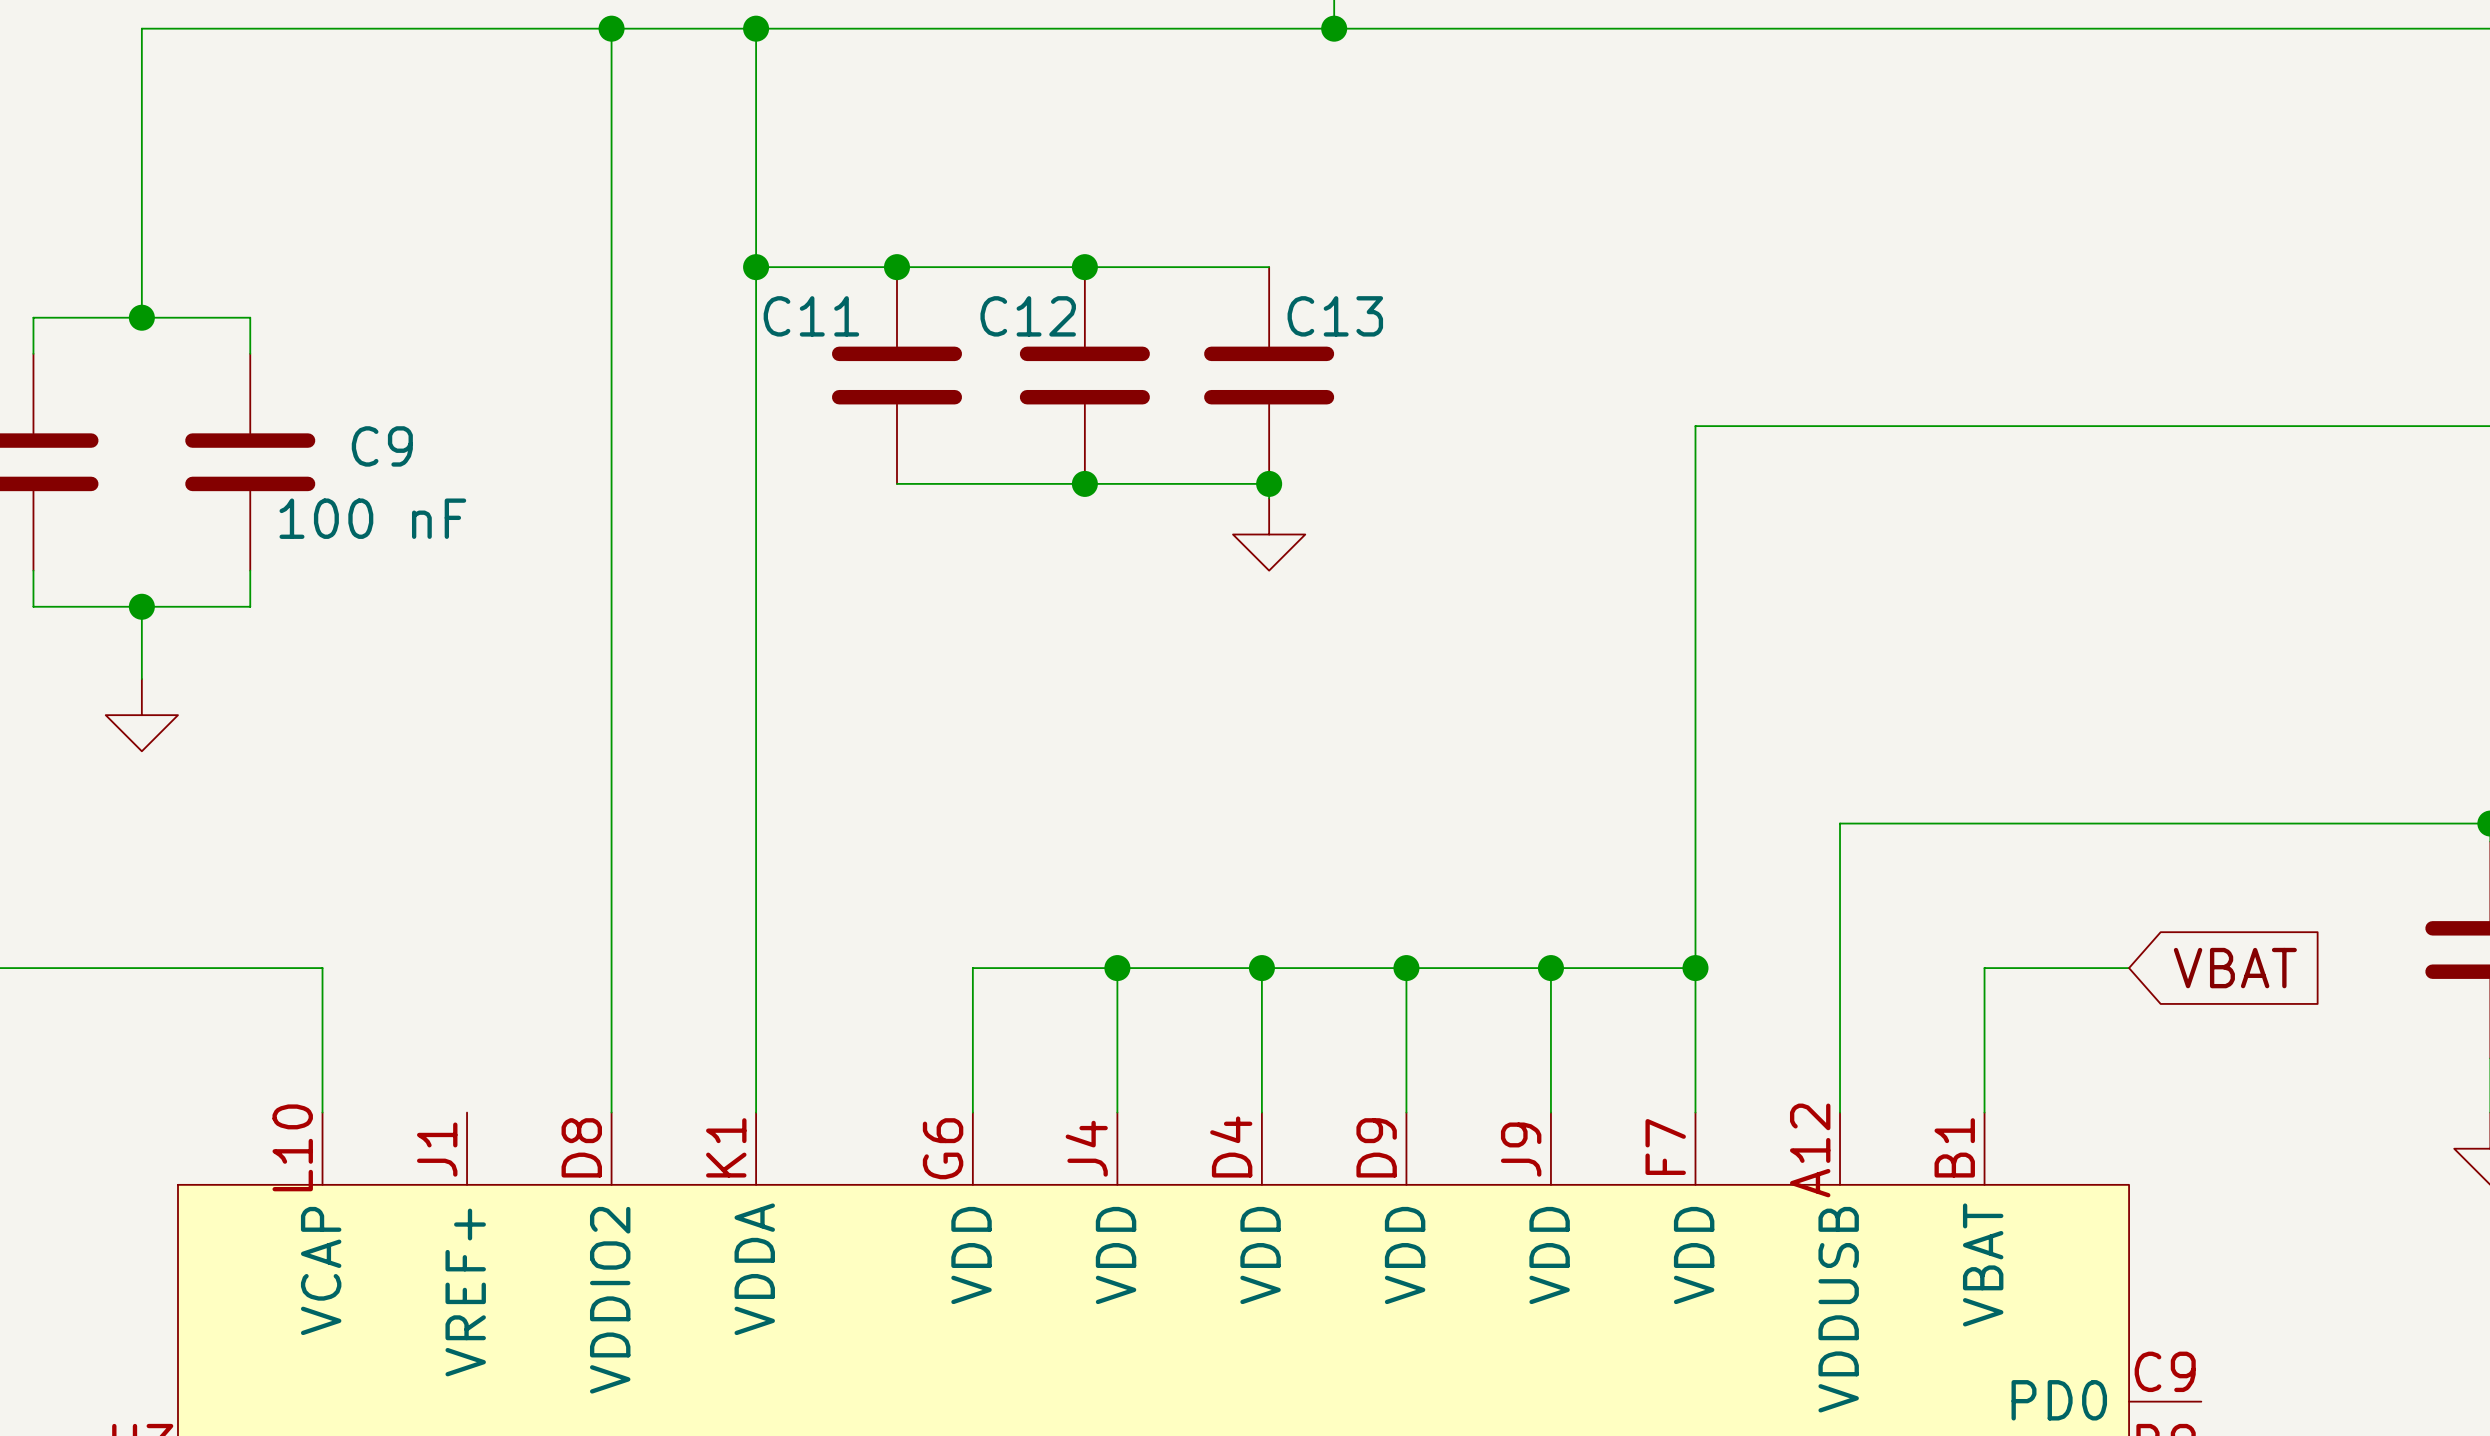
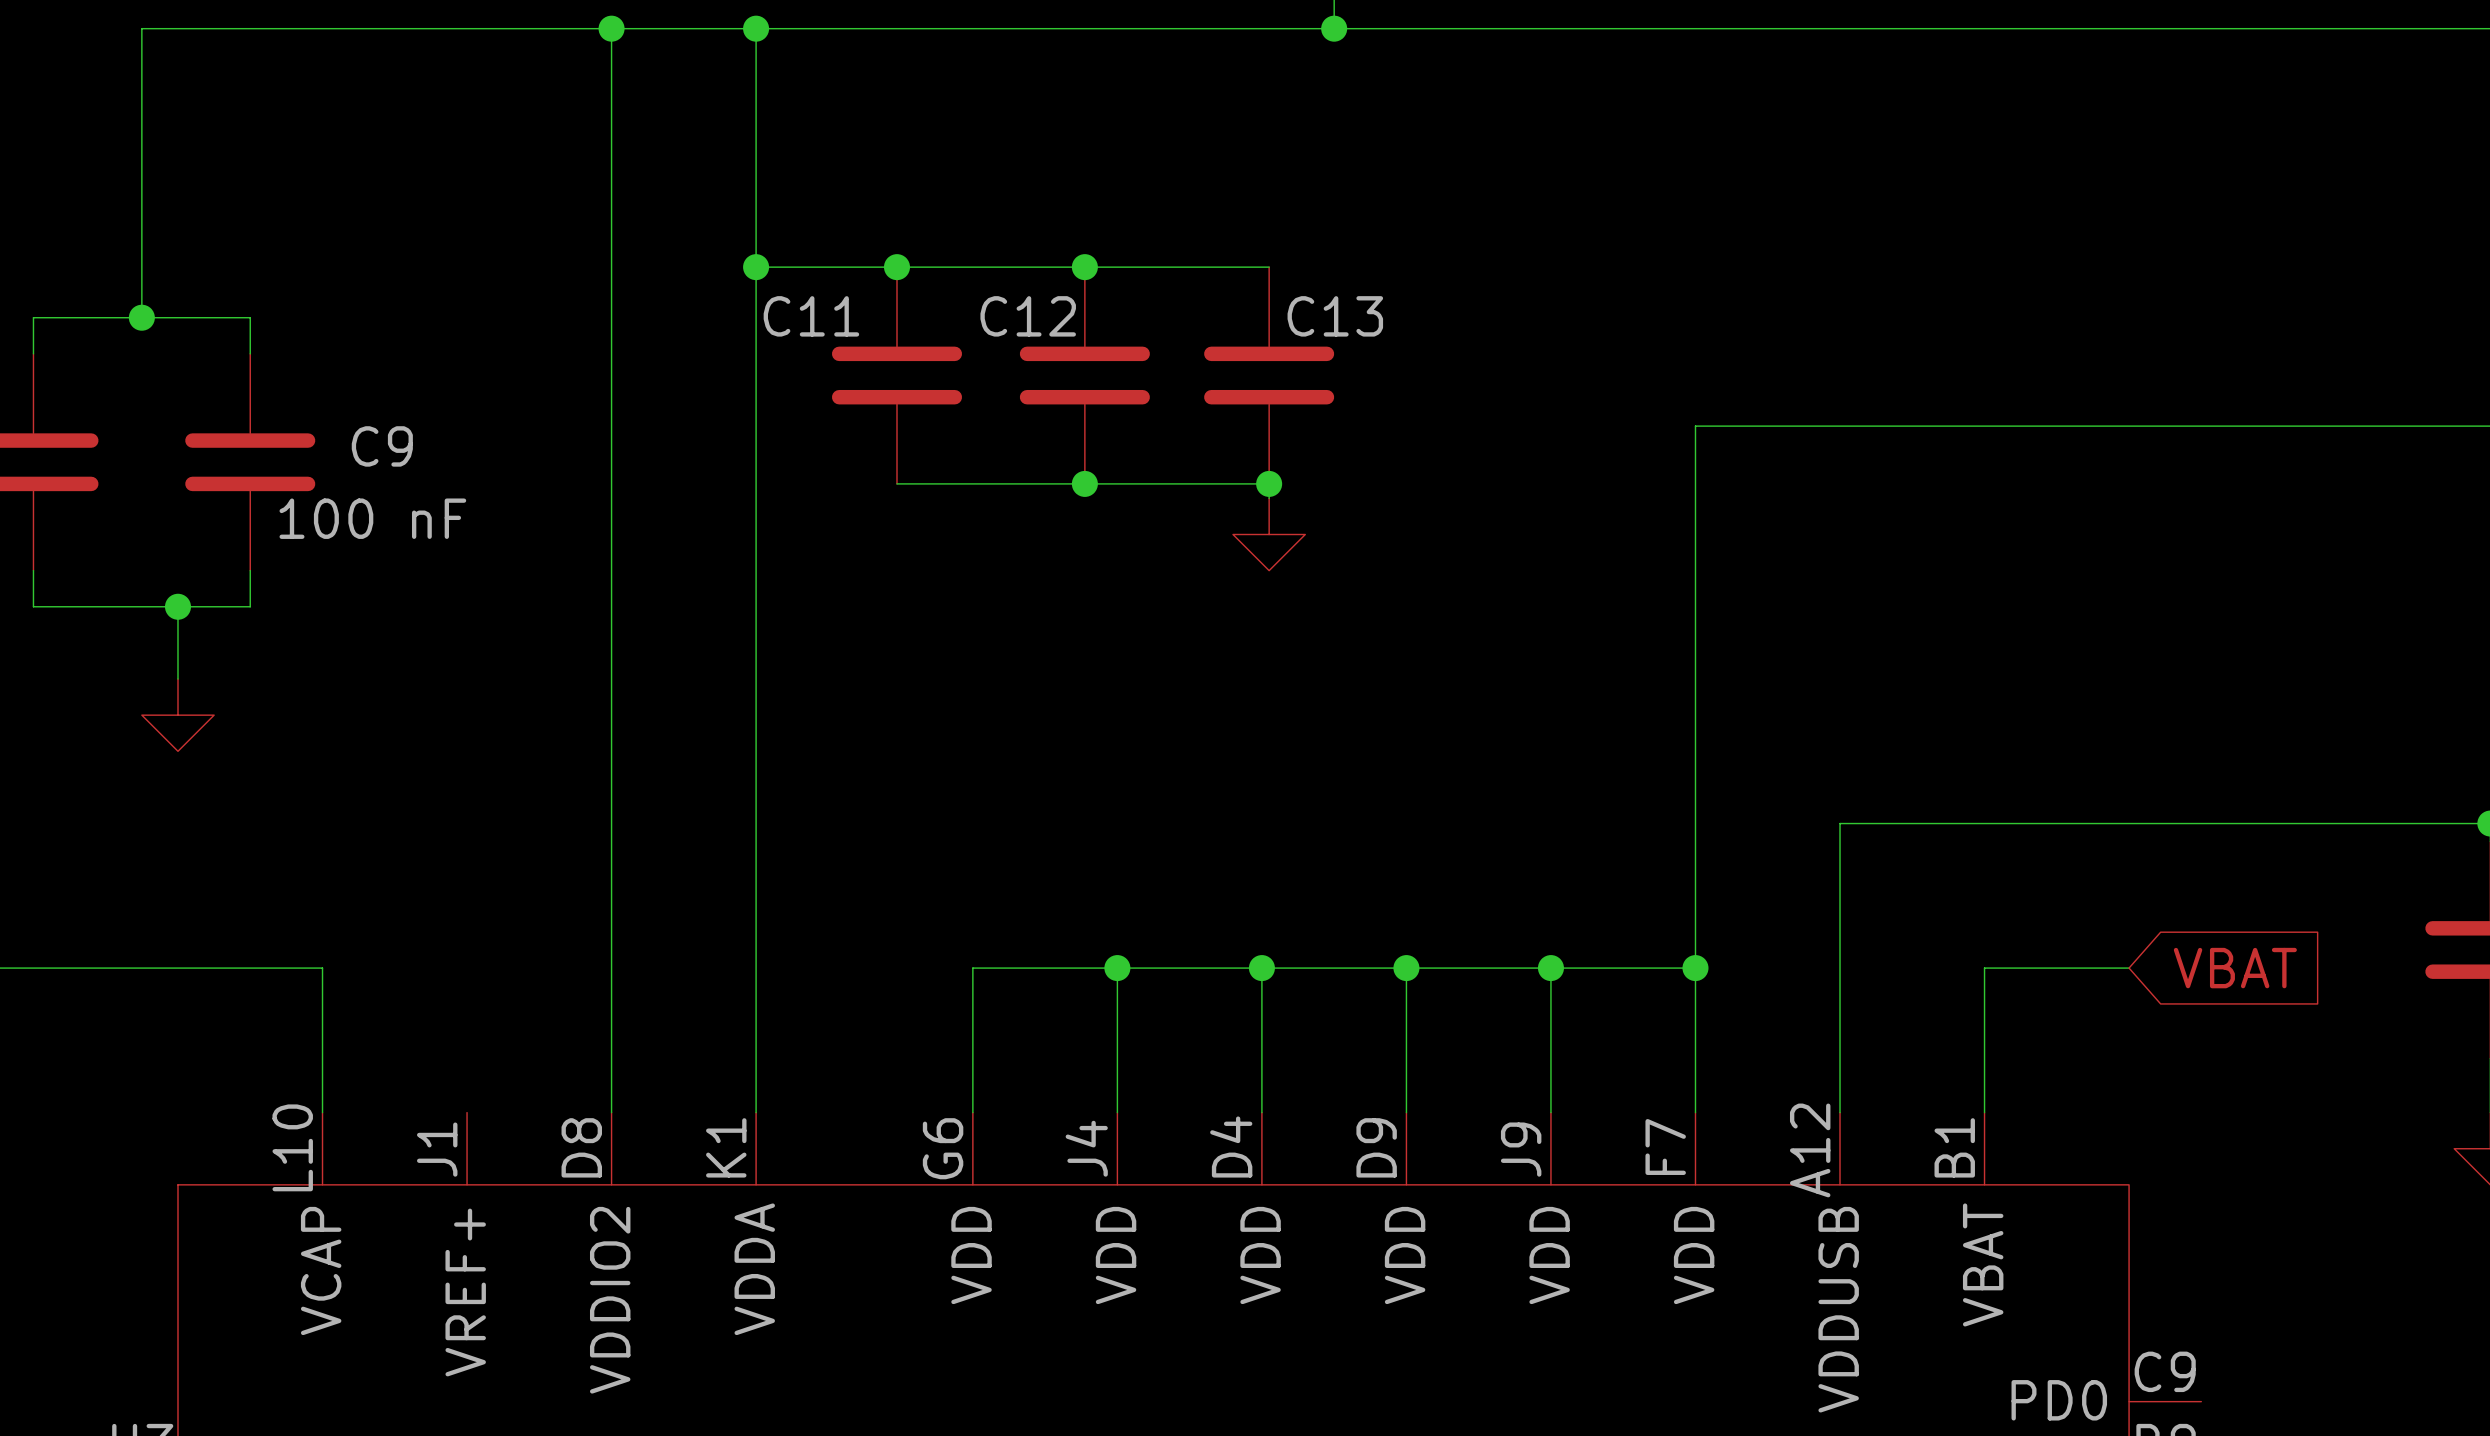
wire: (141, 606) (141, 679) -> (177, 606) (177, 679)
junction position: (141, 606) -> (177, 606)
power symbol position: (141, 715) -> (177, 715)

